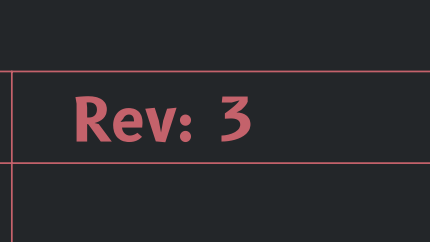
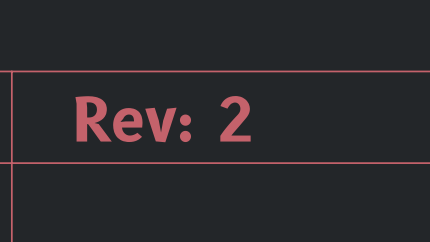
title block: Rev: 3 (162, 119) -> Rev: 2 (163, 119)

